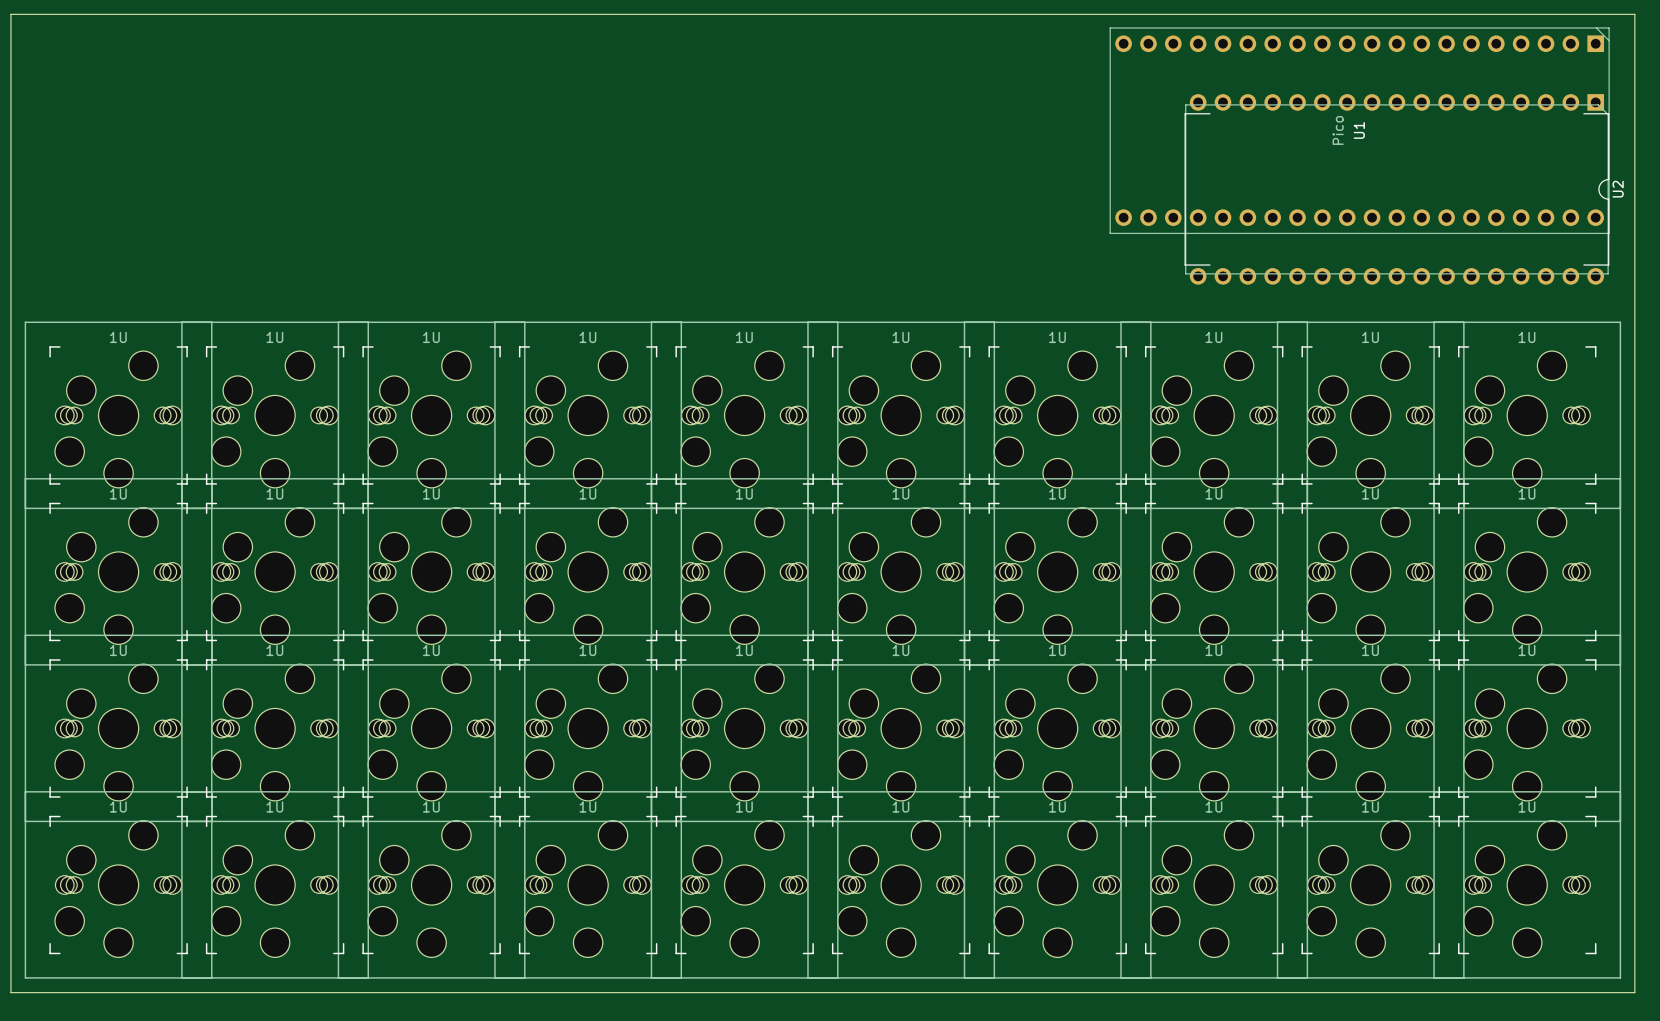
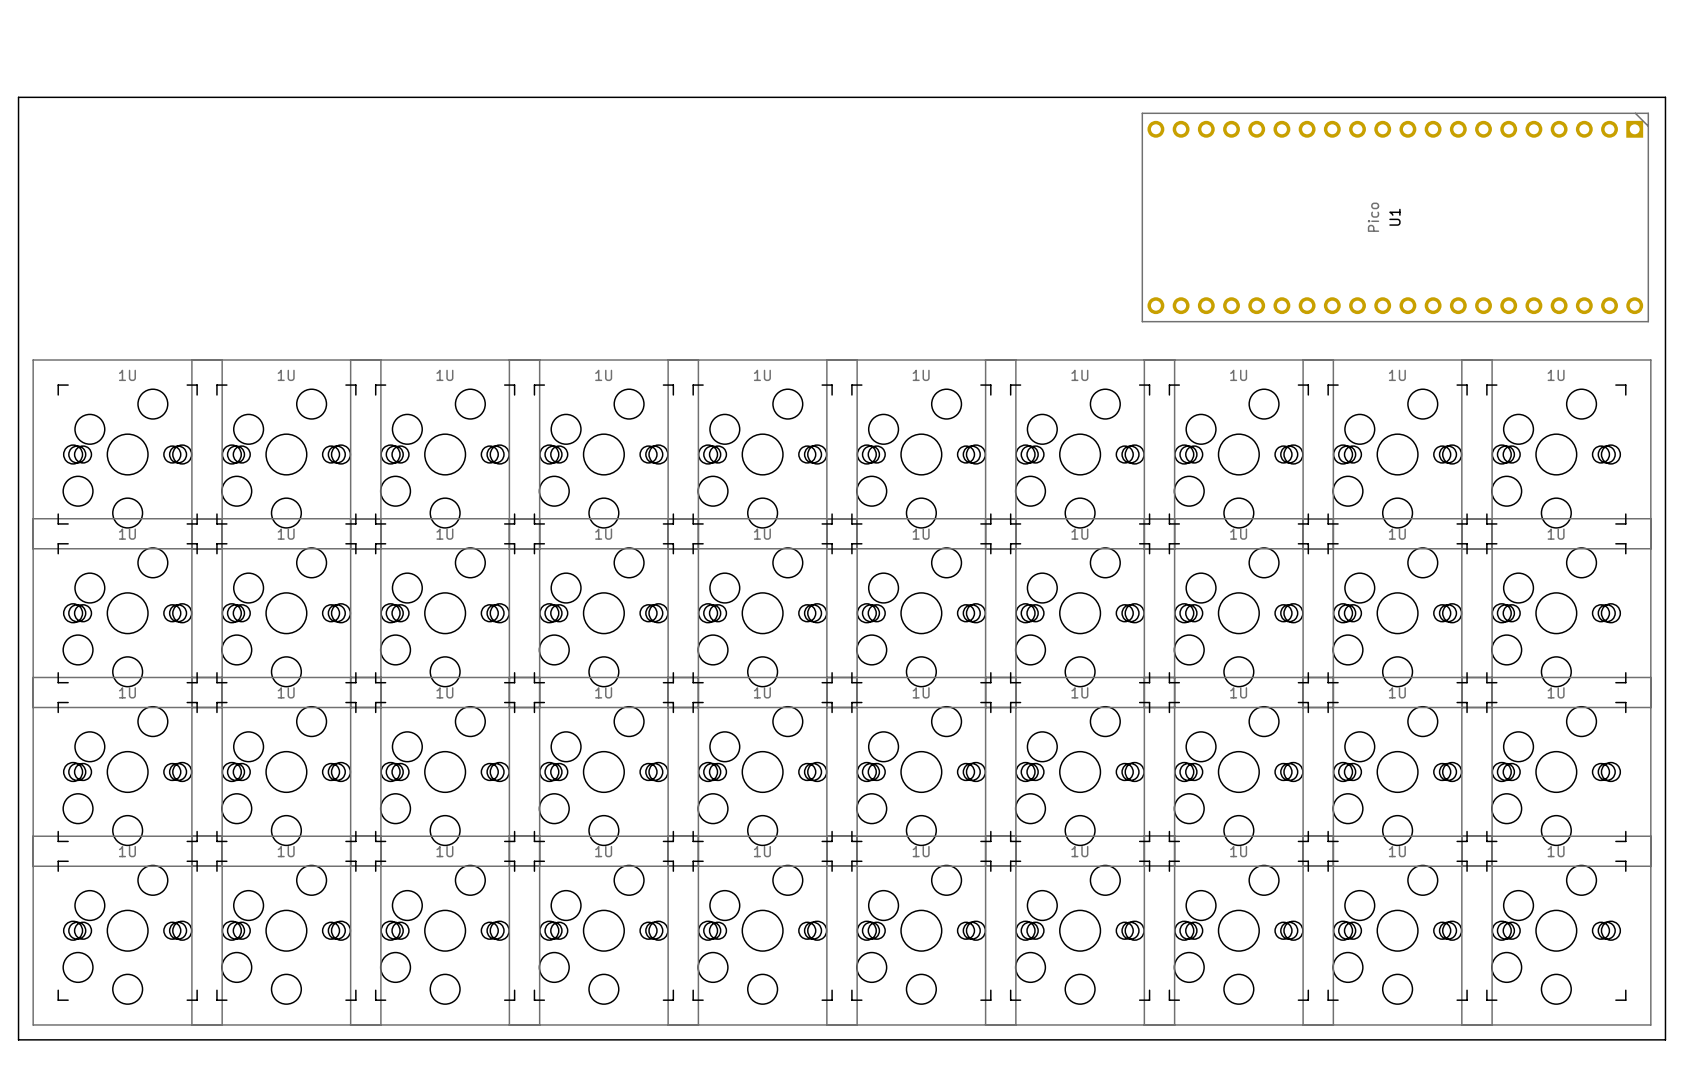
board edge: (10, 63) (10, 14) (1634, 14) (1634, 63) -> (18, 97) (1665, 97)
U1 position: (1359, 130) -> (1395, 217)
U2: (1396, 189) -> none

